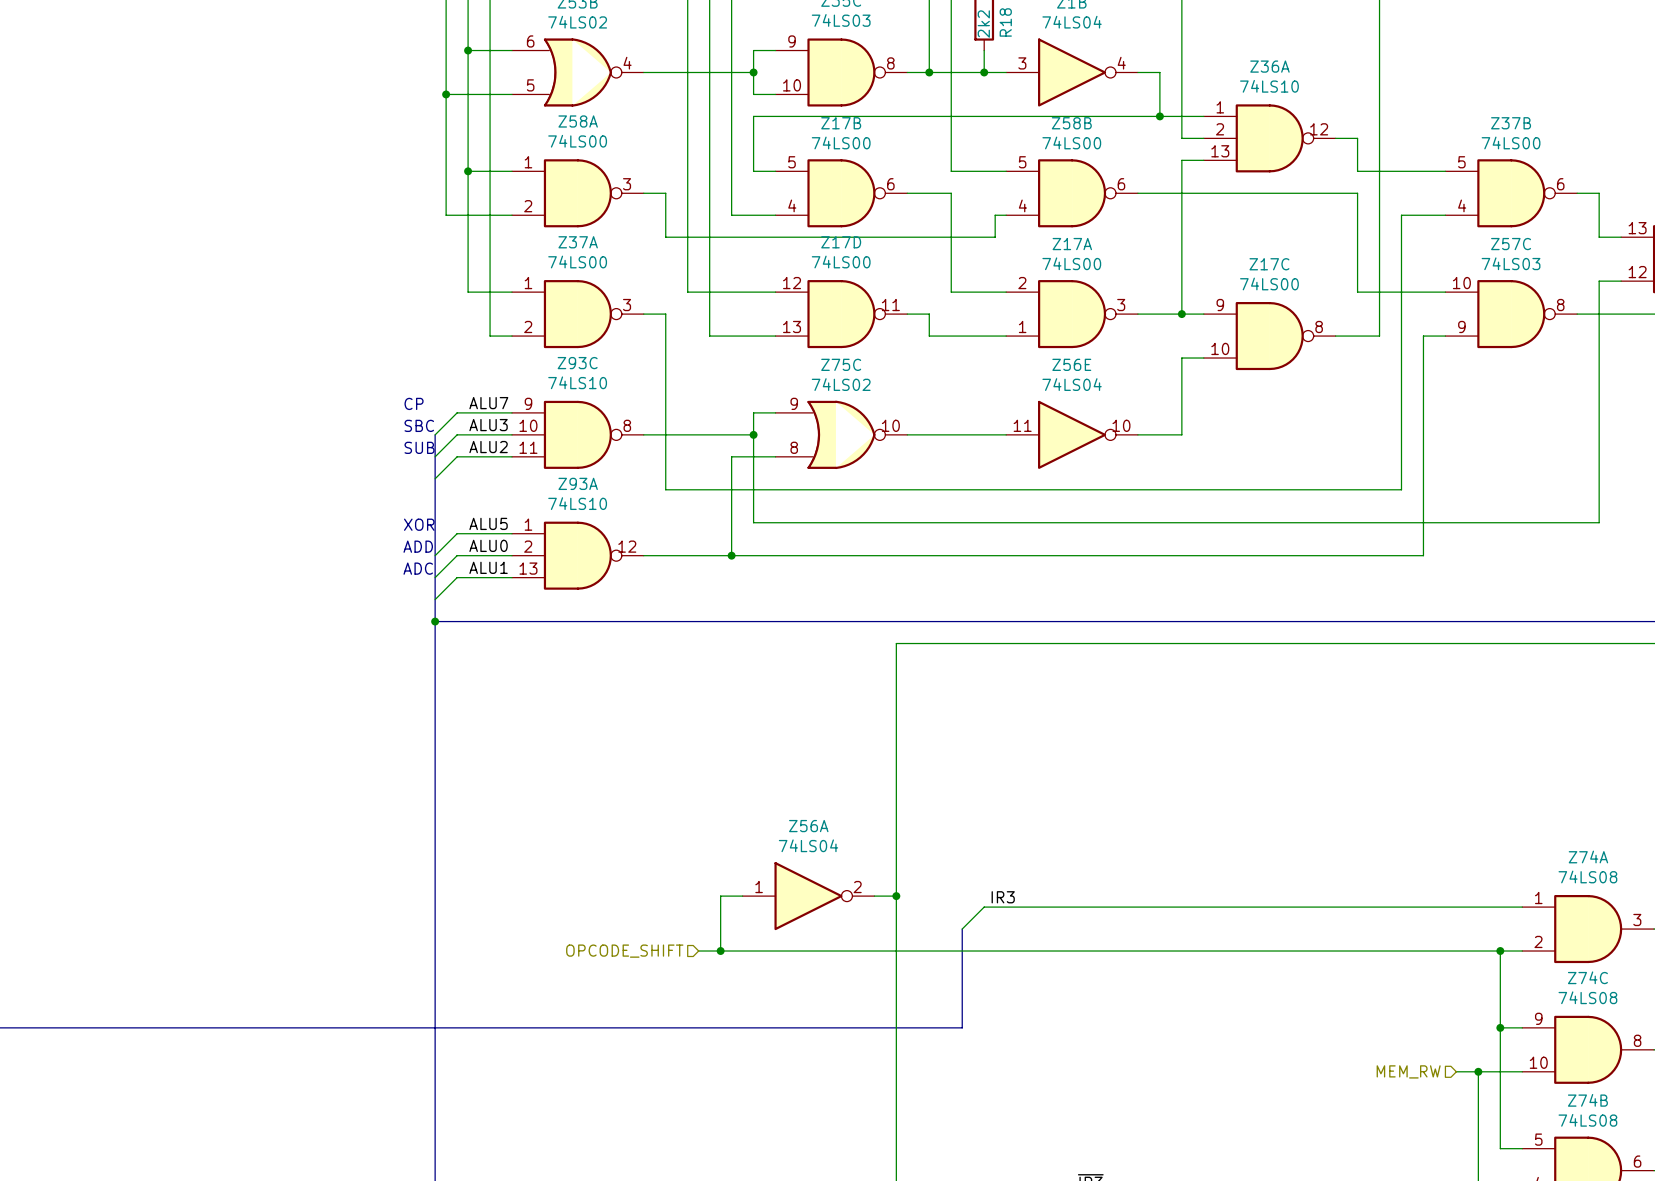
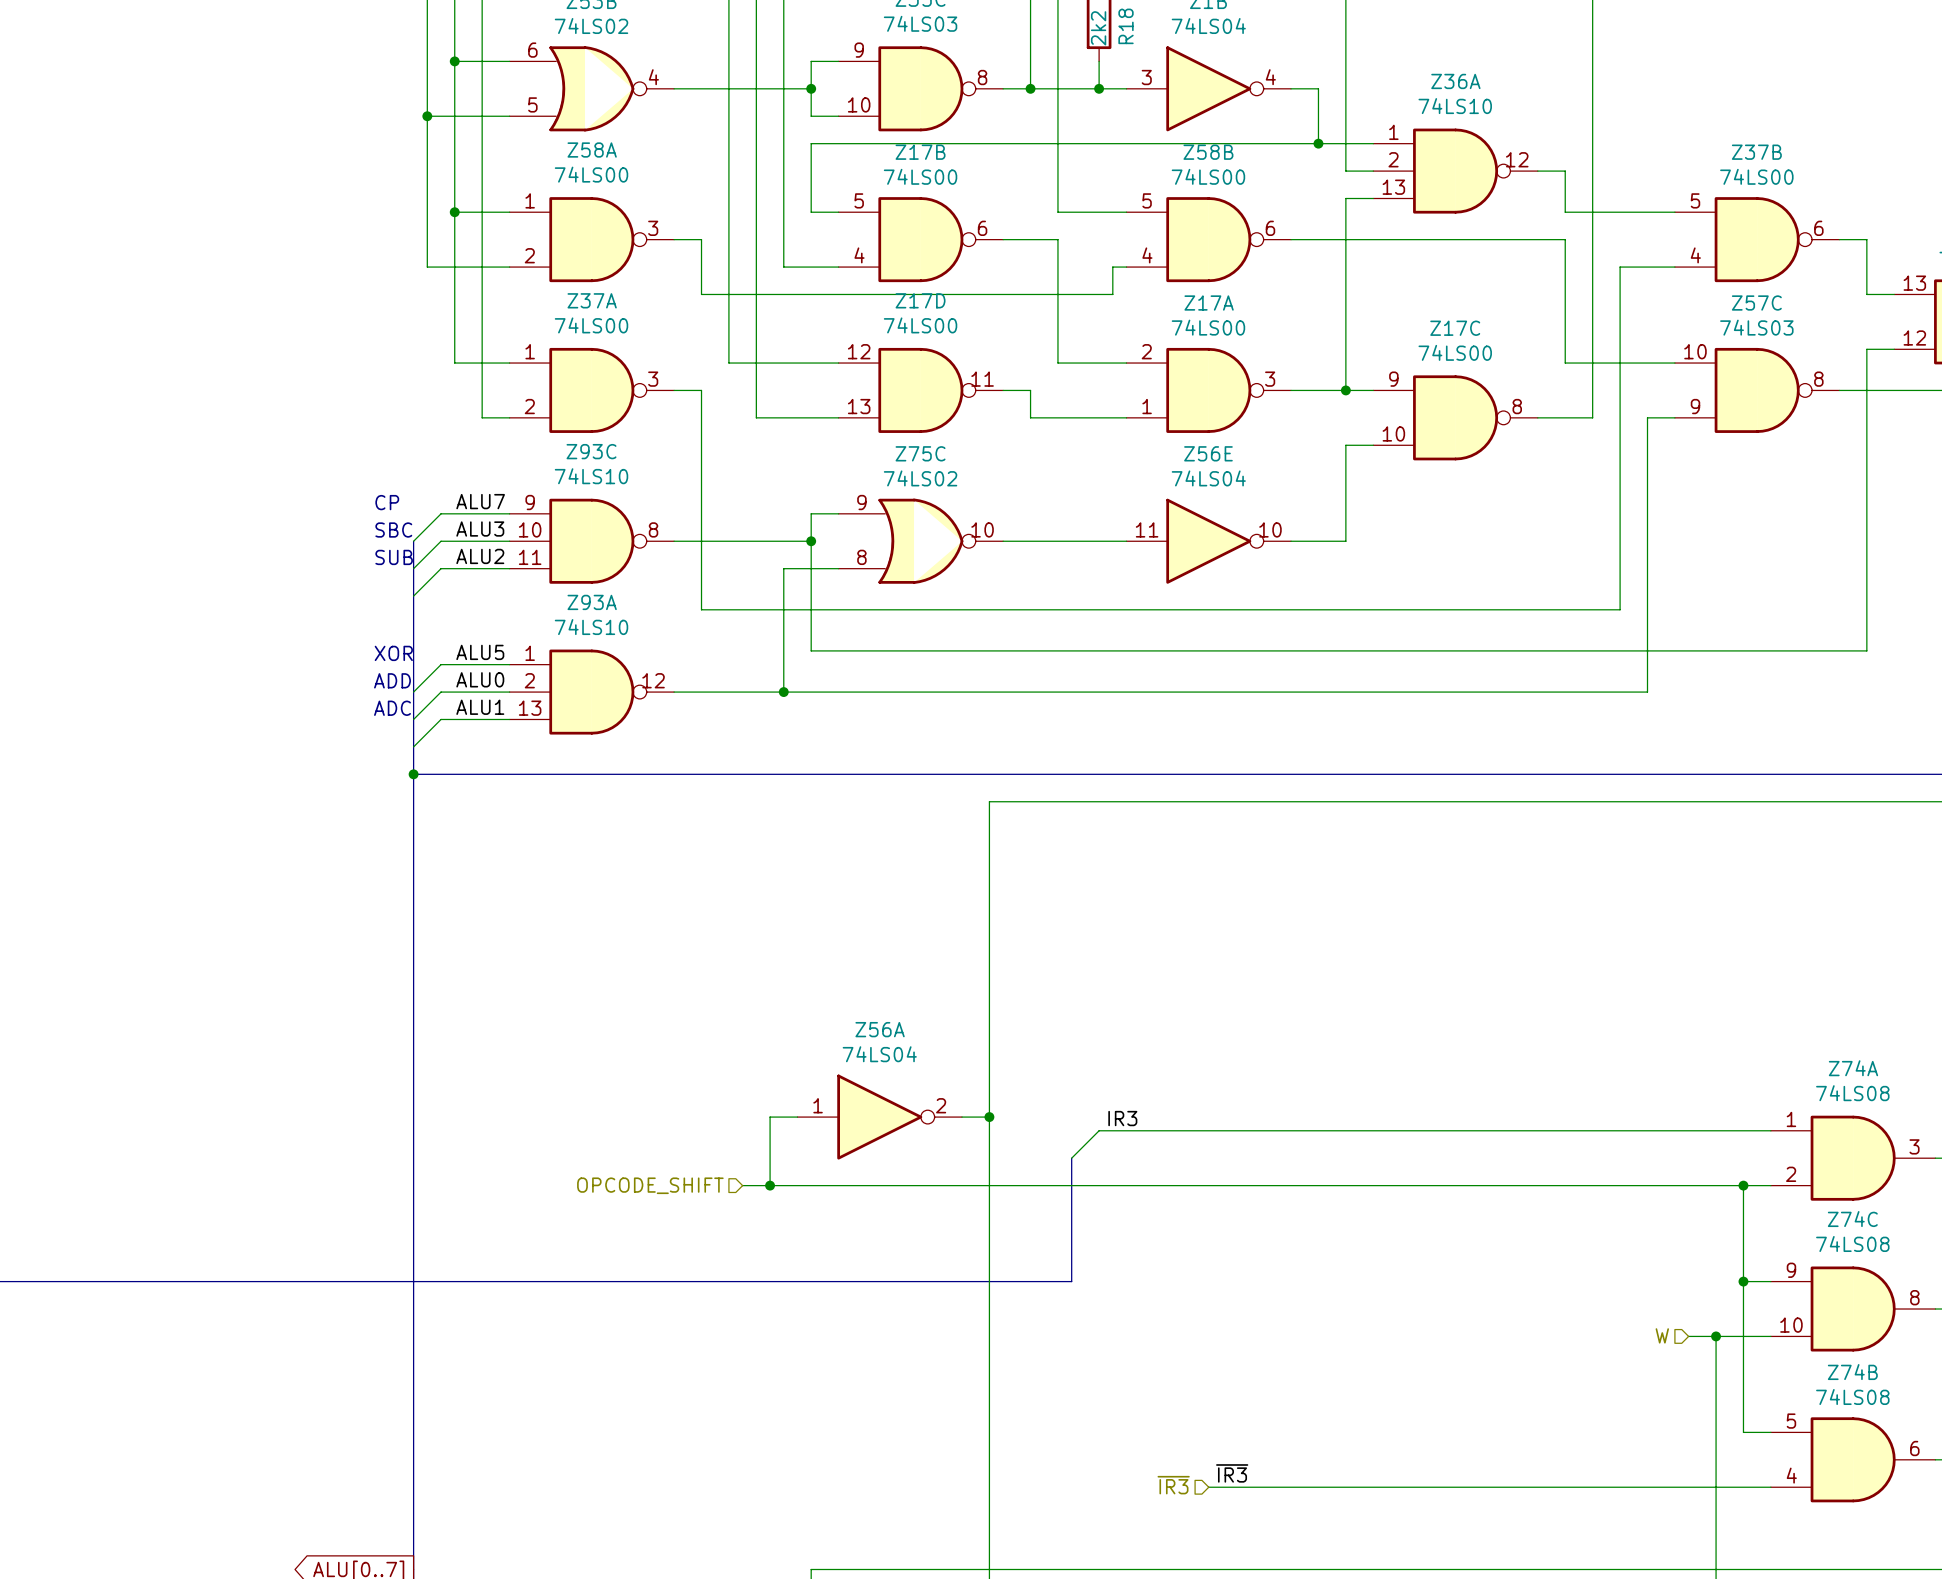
hierarchical label: MEM_RW (1408, 1071) -> W (1662, 1335)

